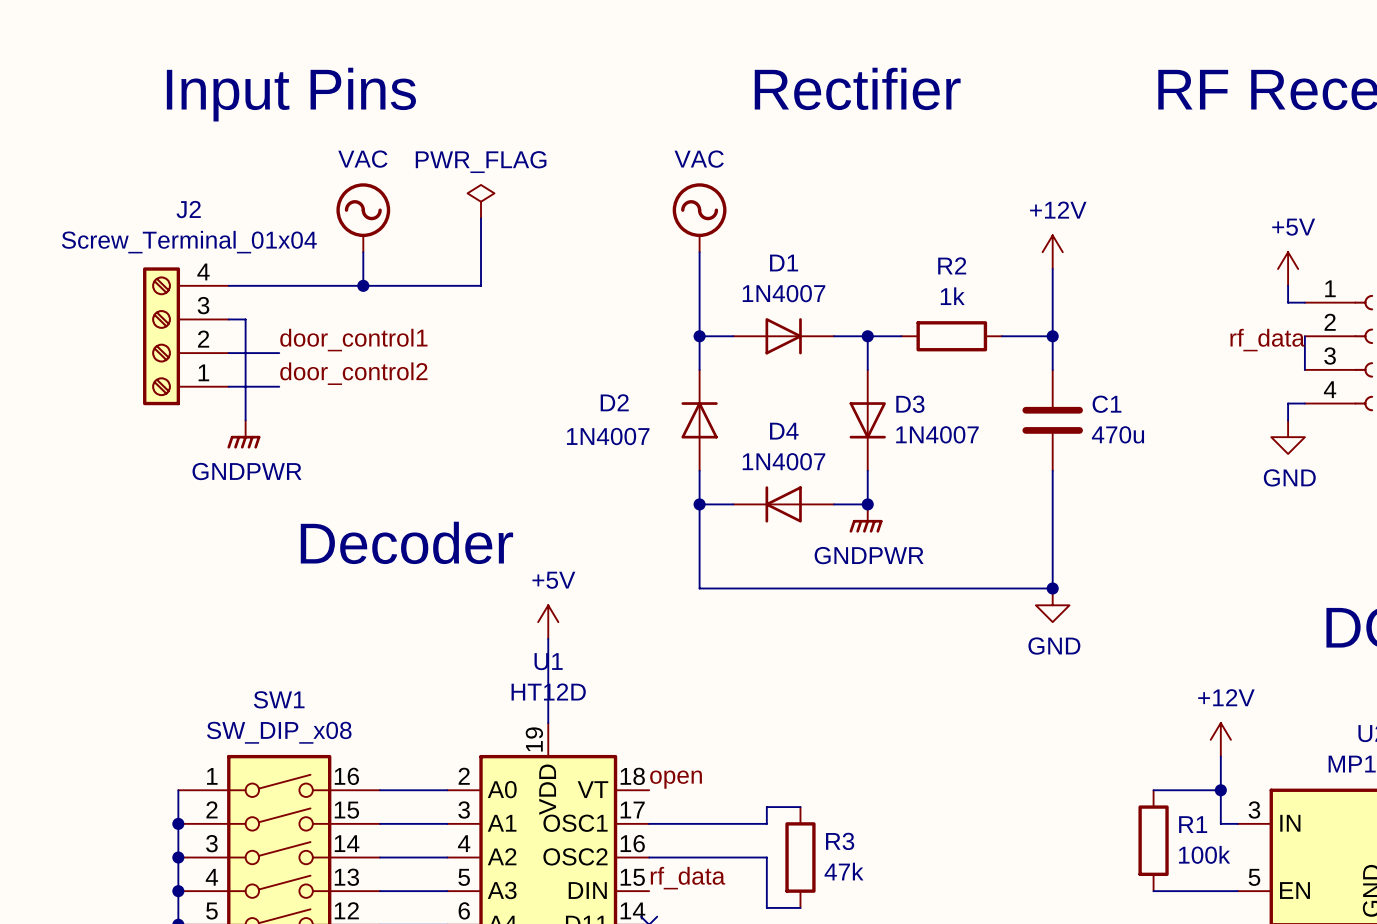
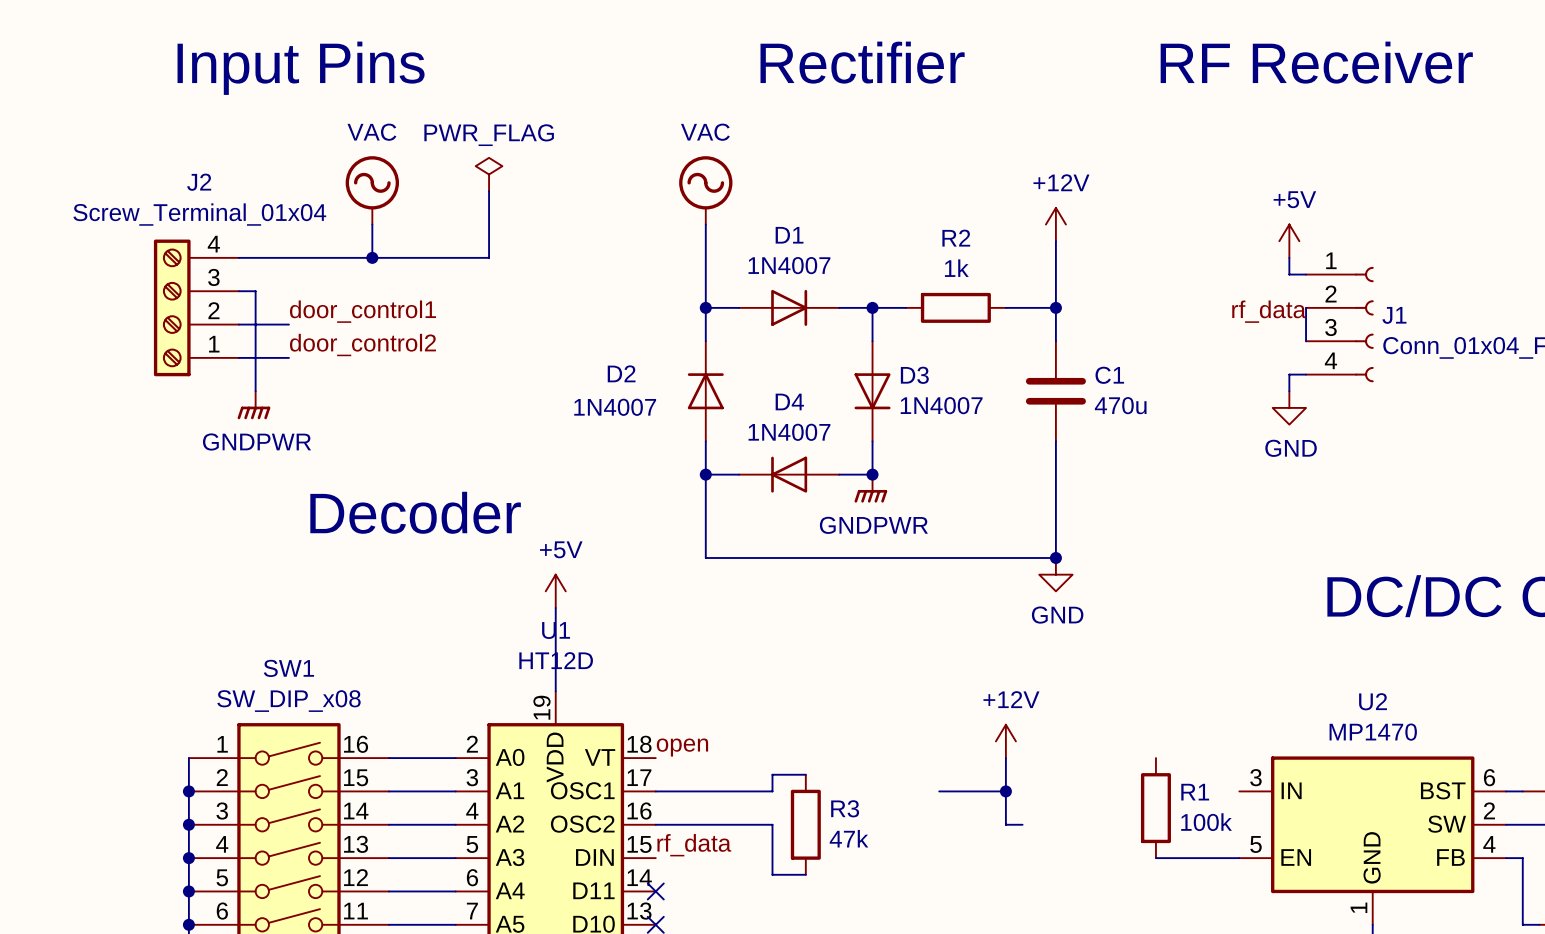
power symbol position: +12V (1220, 739) -> +12V (1005, 741)
wire: (1220, 756) (1220, 823) (1237, 823) -> (1005, 758) (1005, 824) (1022, 824)
wire: (1153, 790) (1220, 790) -> (939, 791) (1005, 791)
junction: (1220, 790) -> none
junction: none -> (1005, 791)

